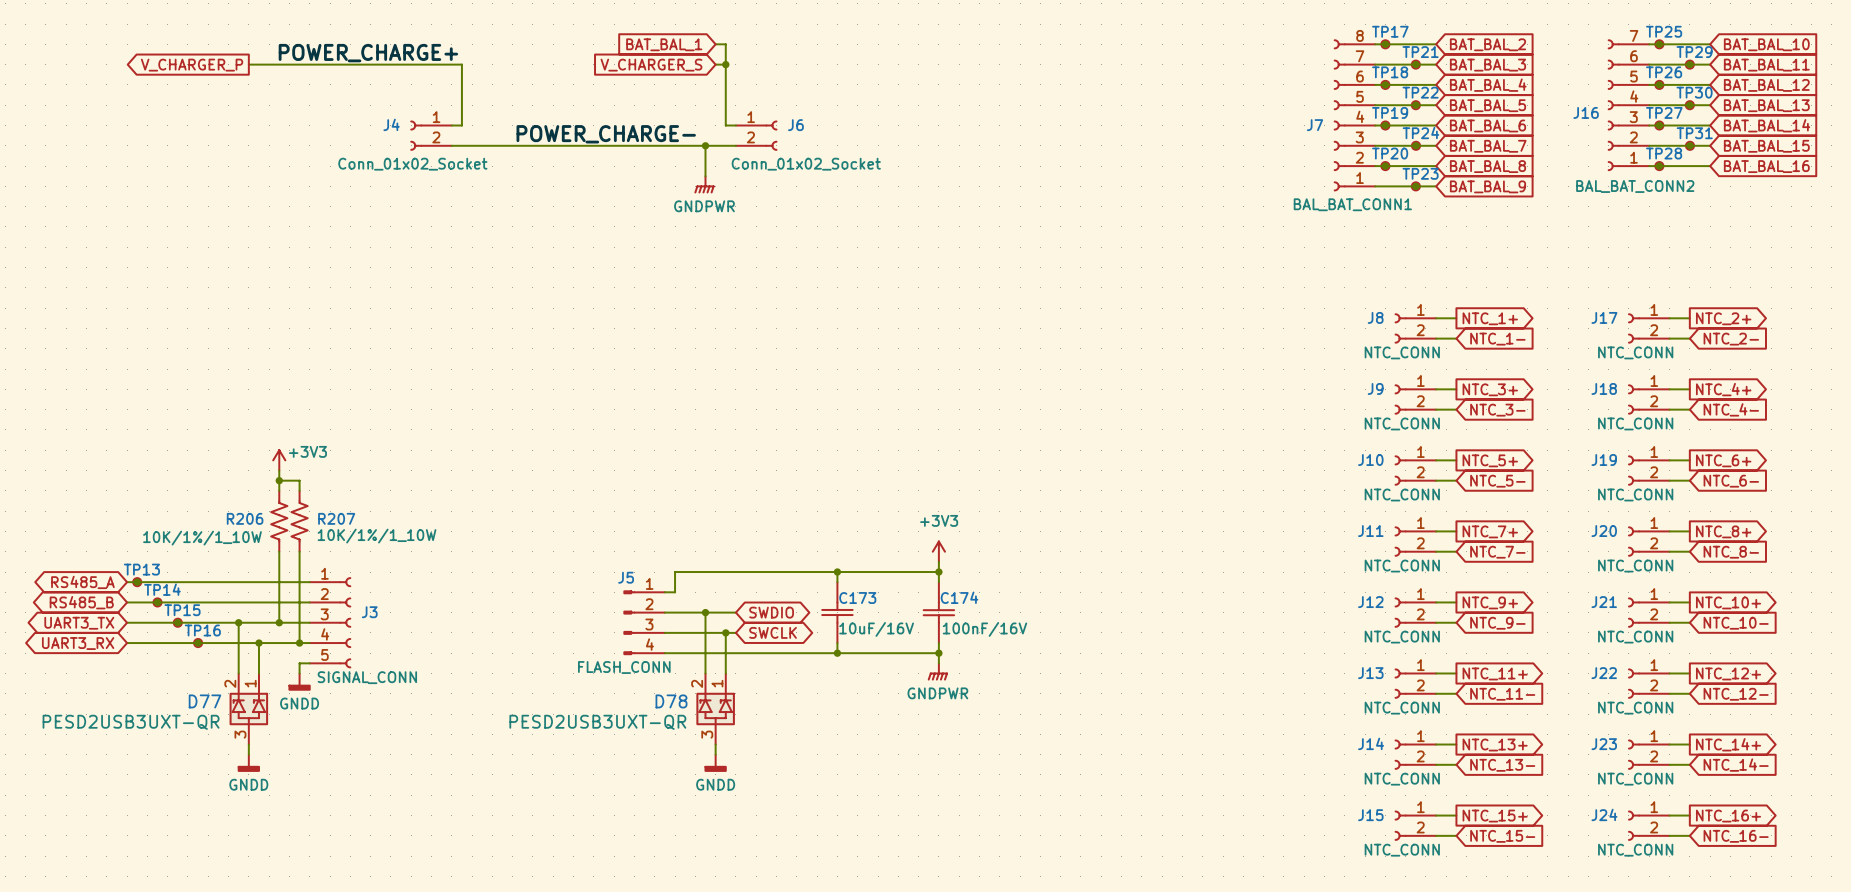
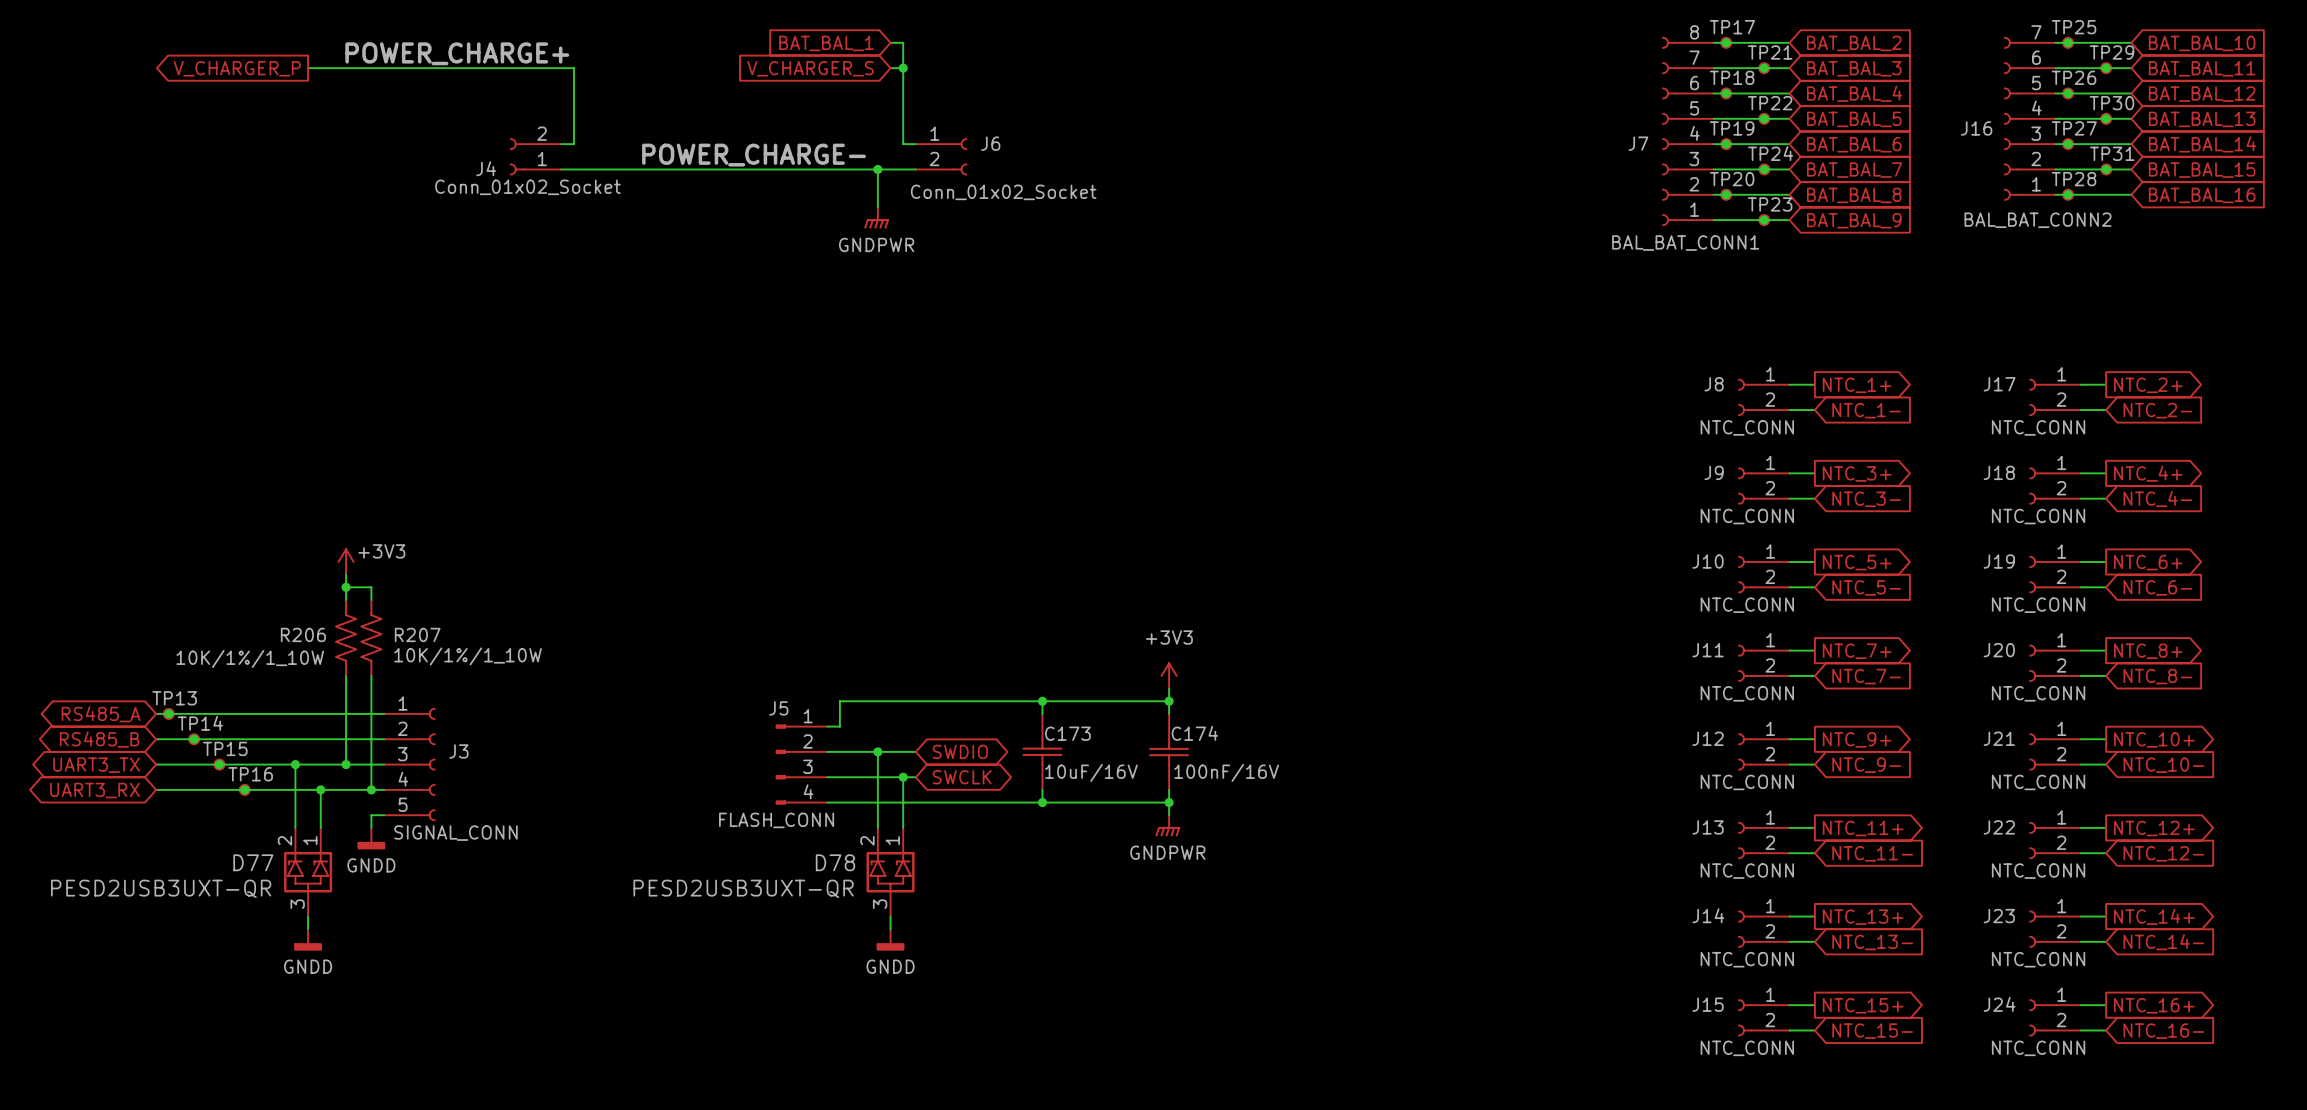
J4 flip: as is (416, 135) -> up-down (517, 156)

